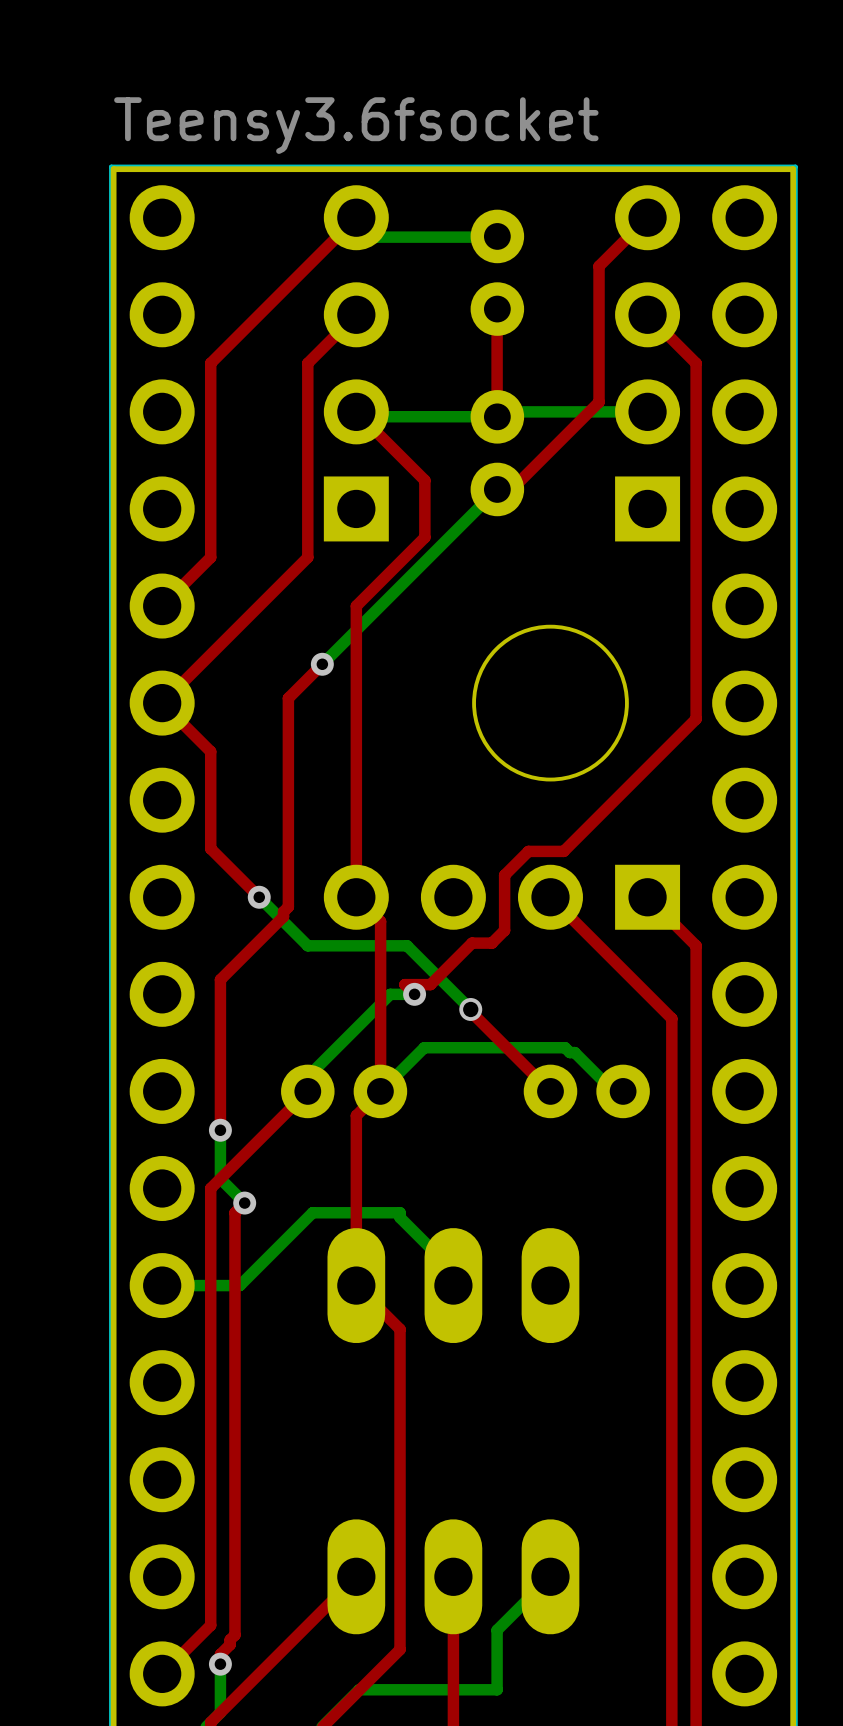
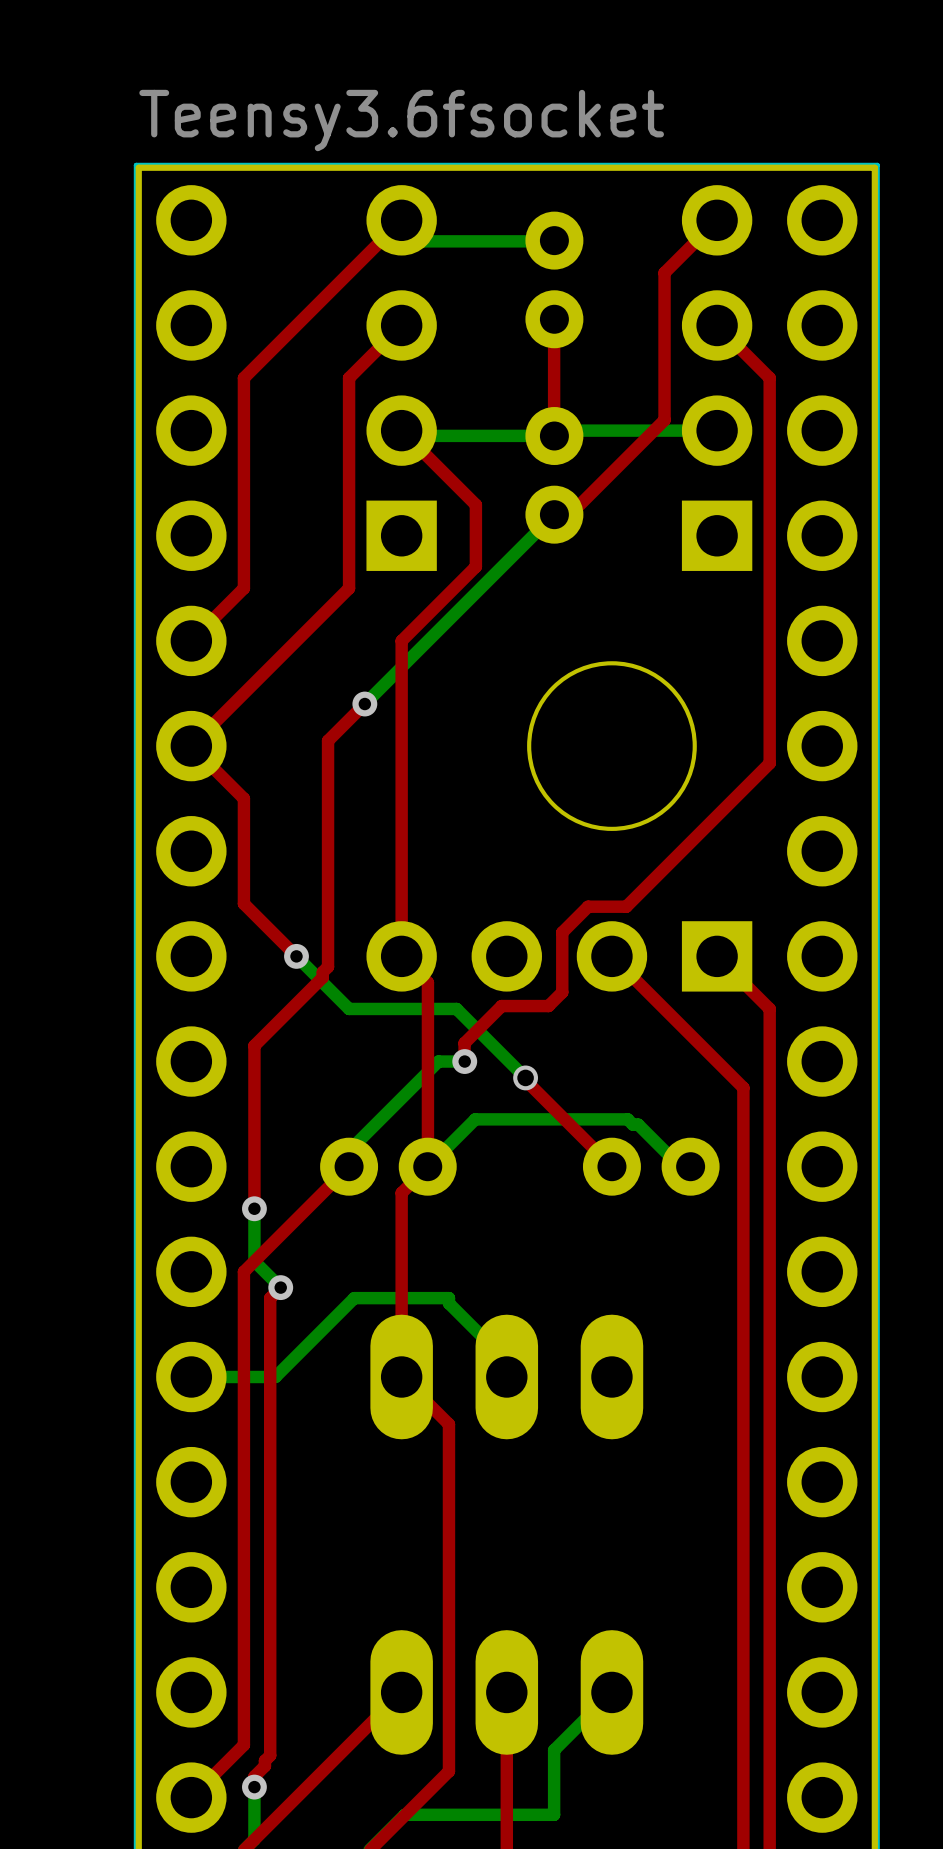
top track: (472, 943) (430, 984) (404, 984) (414, 994) -> (526, 1006) (501, 1006) (464, 1043) (464, 1061)

